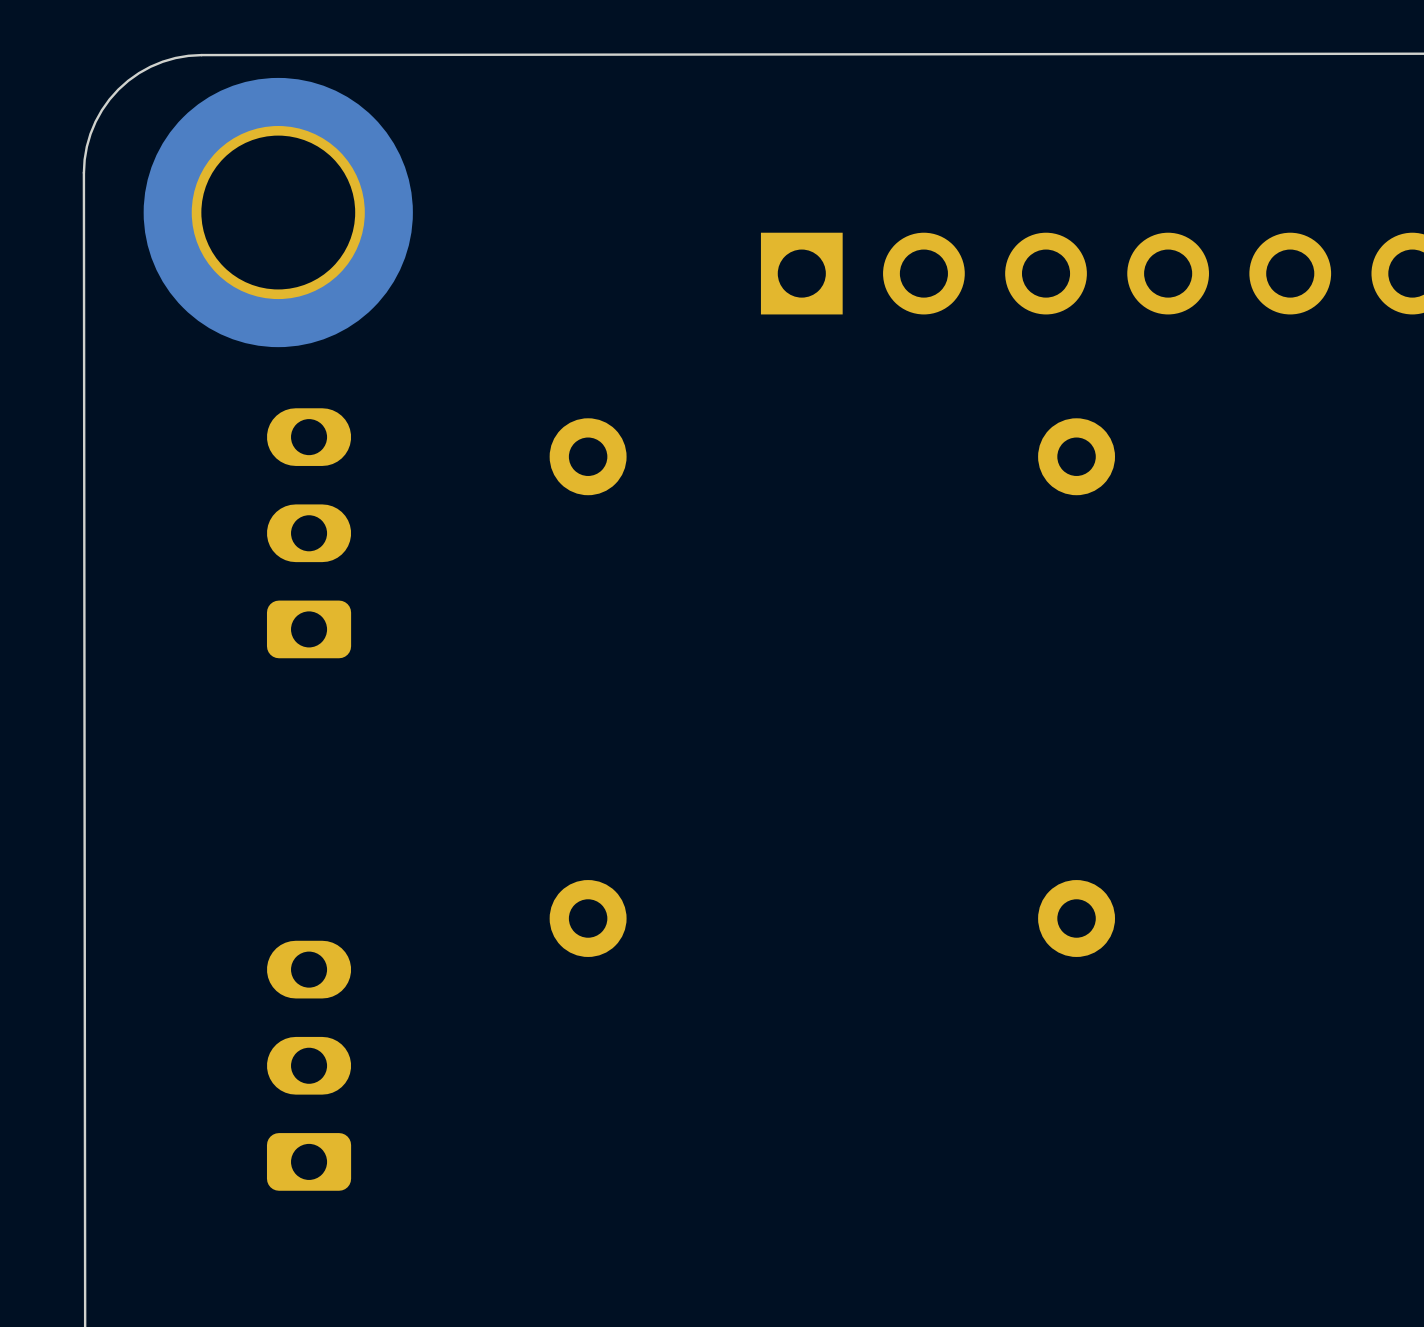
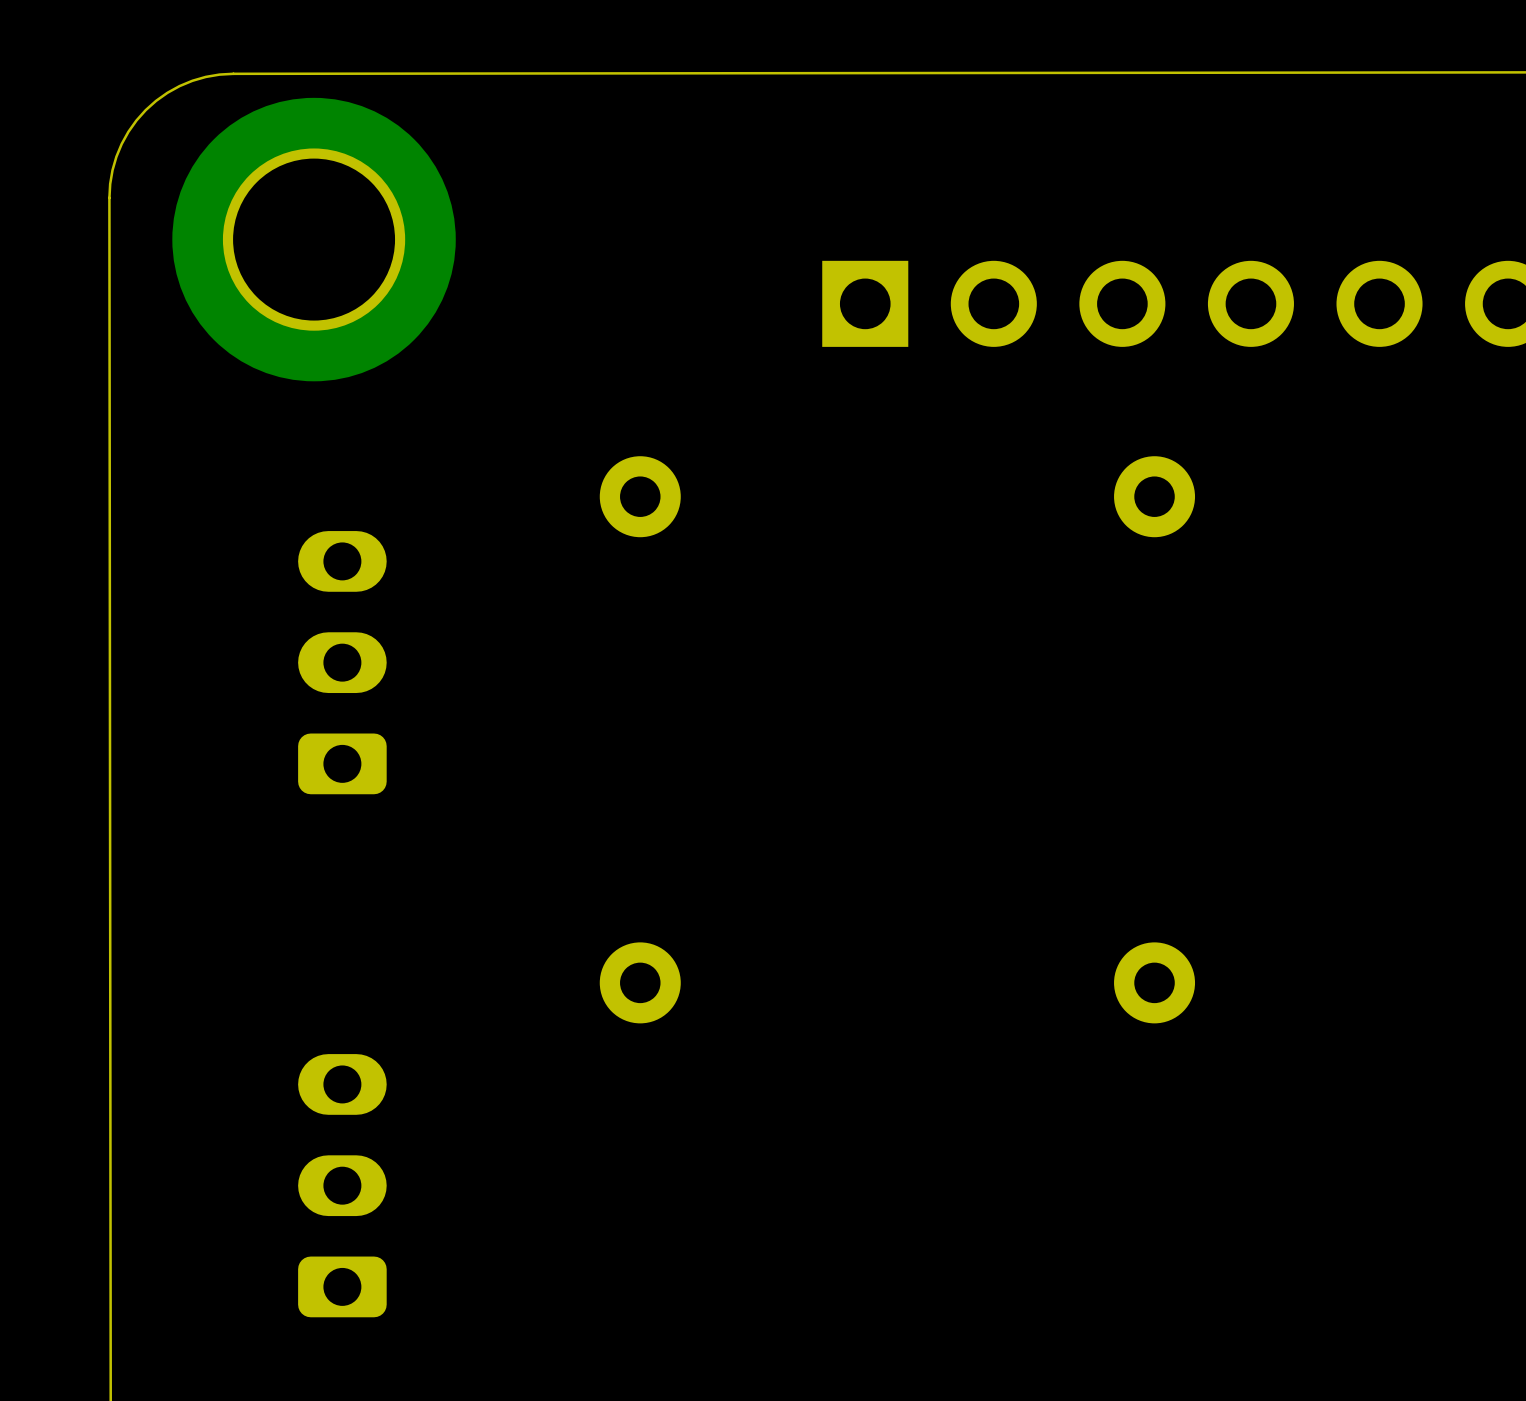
part position: (309, 533) -> (342, 662)
part position: (309, 1065) -> (342, 1185)

